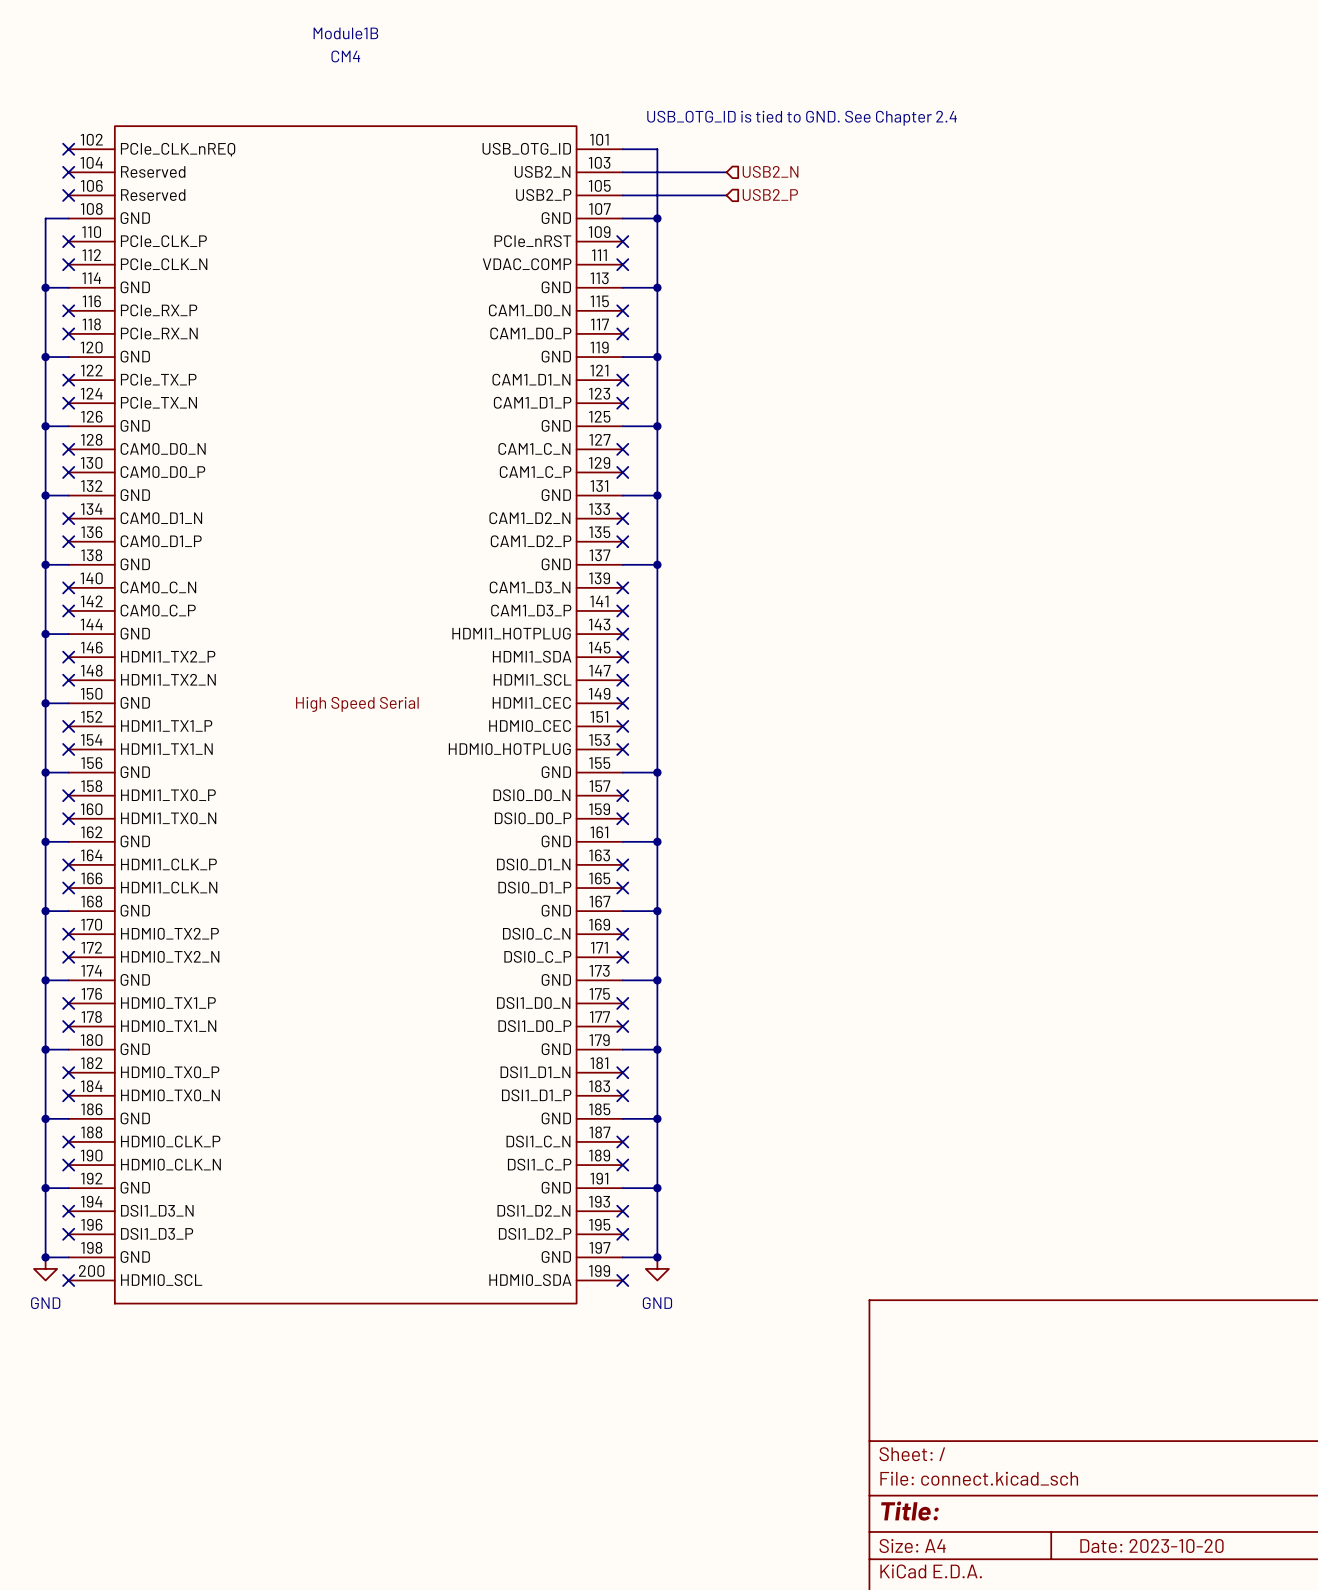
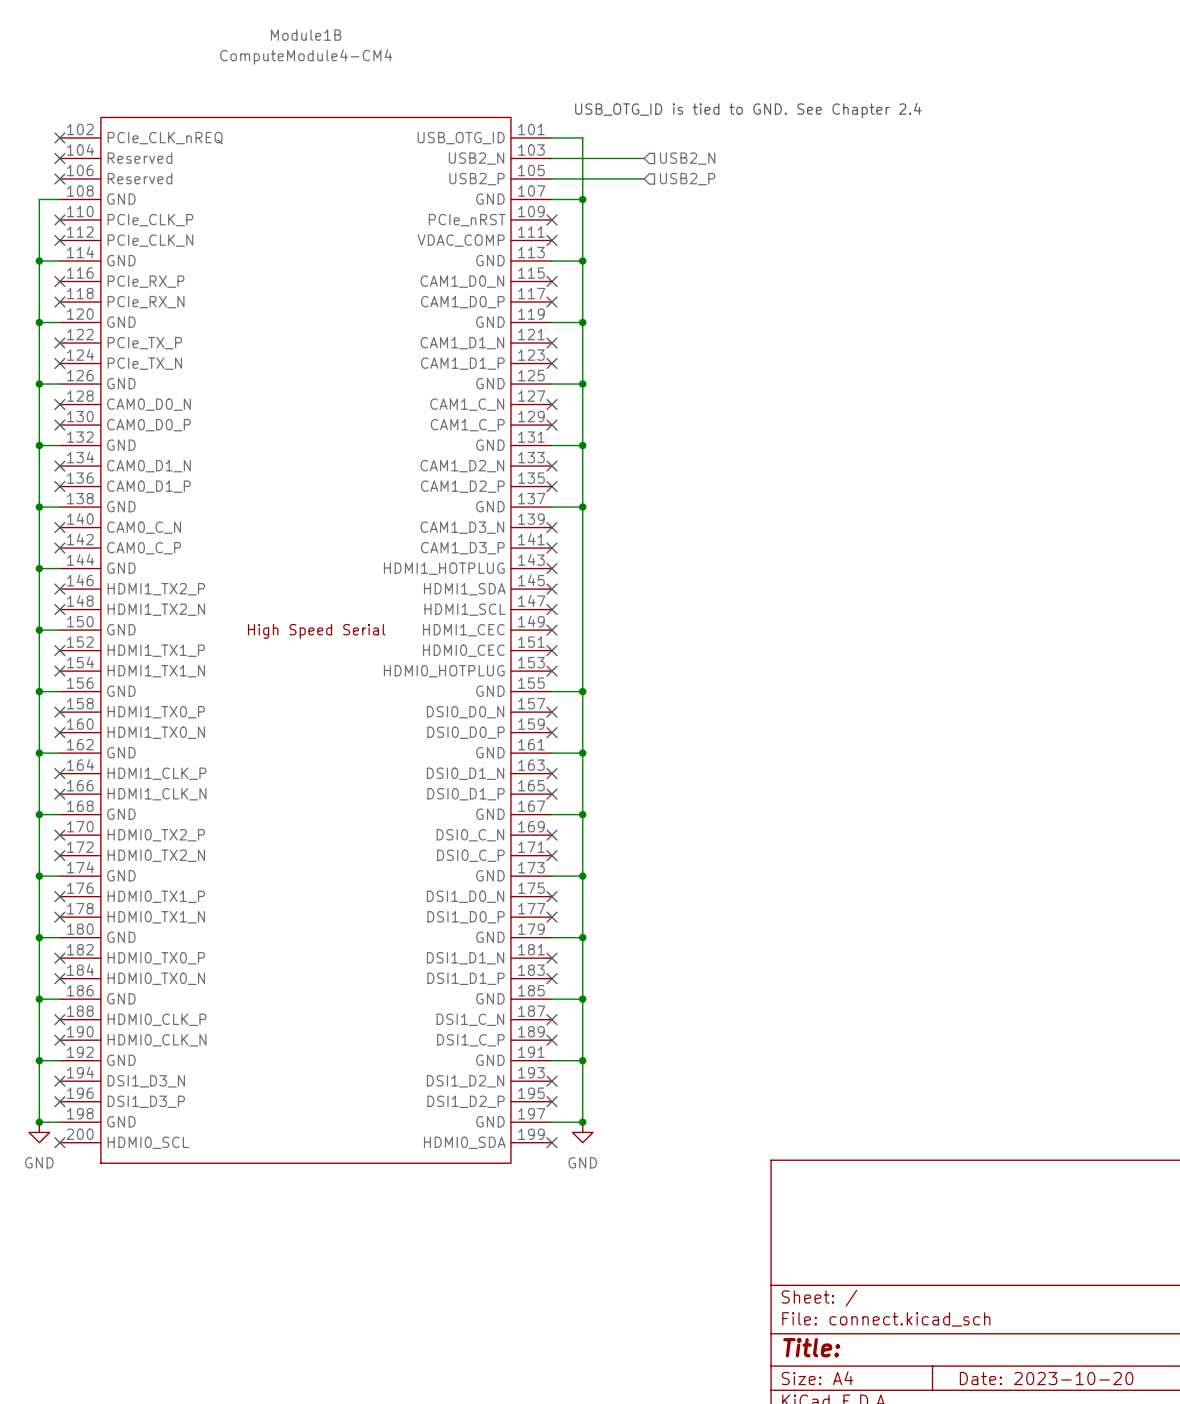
Module1B value: CM4 (345, 56) -> ComputeModule4-CM4 (306, 57)

